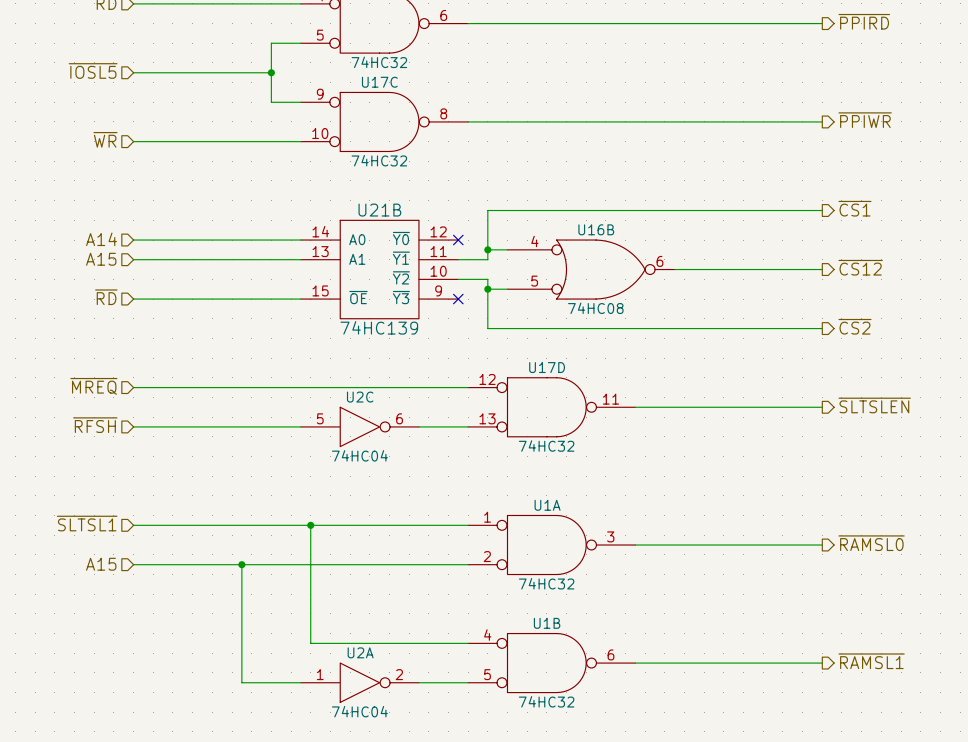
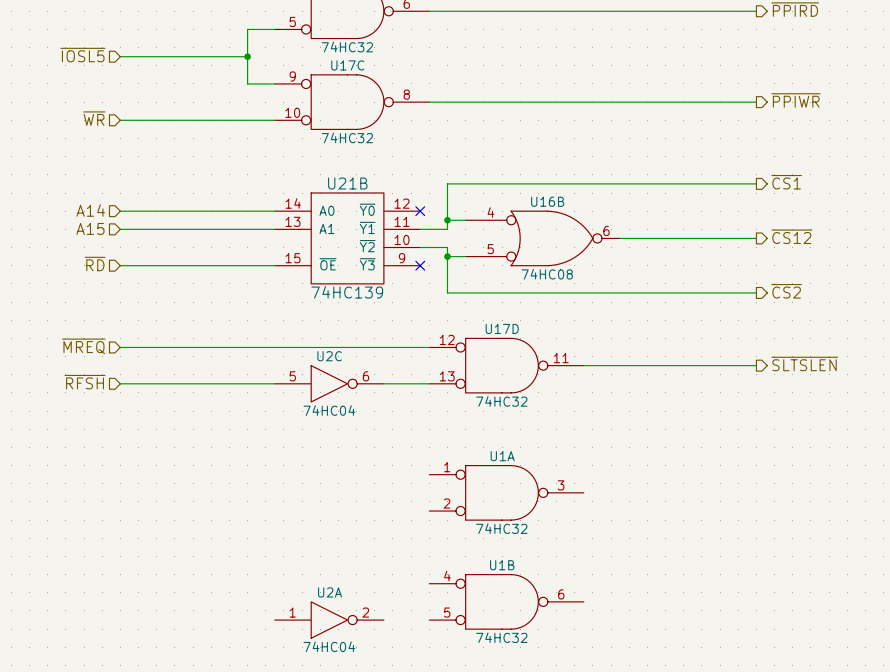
hierarchical label: ~{SLTSL1} (87, 523) -> none
wire: (133, 525) (468, 525) -> none
wire: (310, 525) (310, 643) (468, 643) -> none
junction: (310, 525) -> none
hierarchical label: ~{RAMSL0} (871, 543) -> none
wire: (635, 545) (822, 545) -> none
hierarchical label: A15 (101, 564) -> none
wire: (133, 564) (468, 564) -> none
wire: (241, 564) (241, 682) (300, 682) -> none
junction: (241, 564) -> none
hierarchical label: ~{RAMSL1} (871, 661) -> none
wire: (635, 663) (822, 663) -> none
wire: (418, 682) (468, 682) -> none

